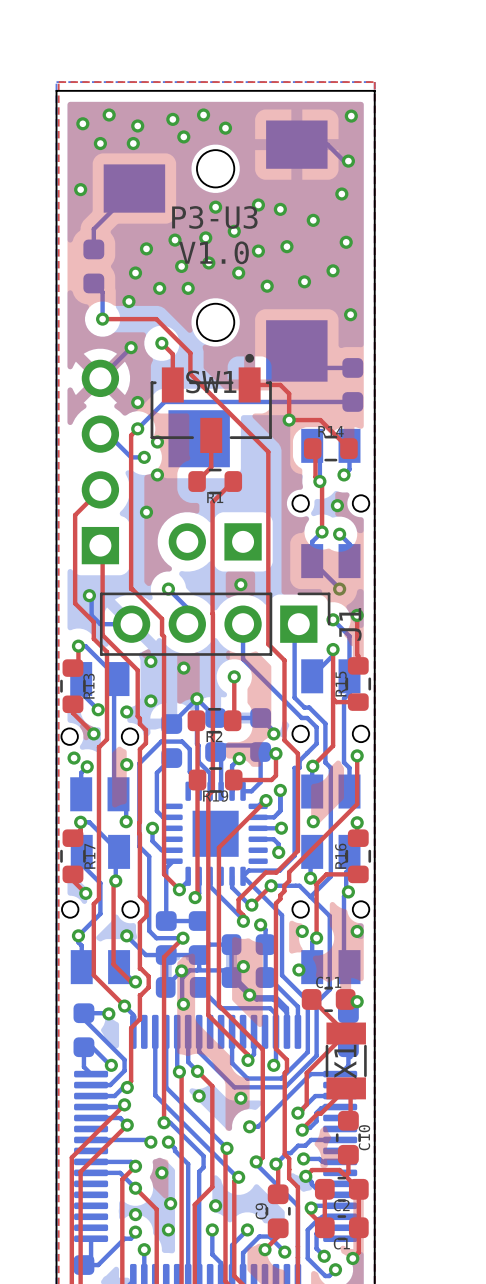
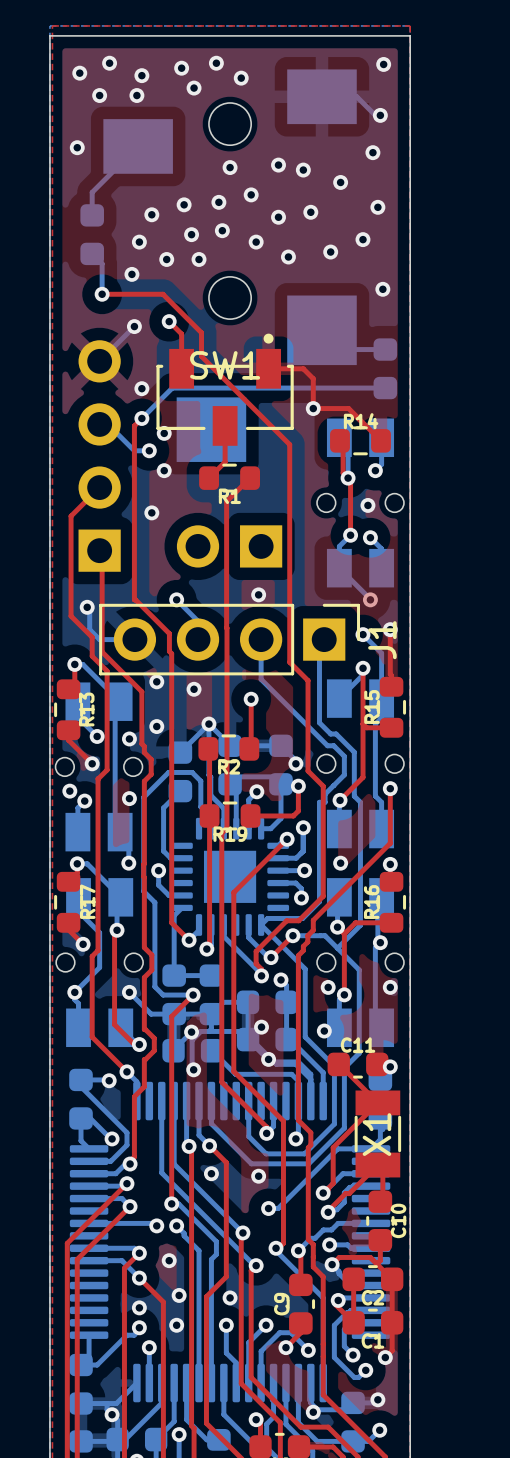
text: P3-U3 (214, 217) -> none
text: V1.0 (213, 252) -> none

